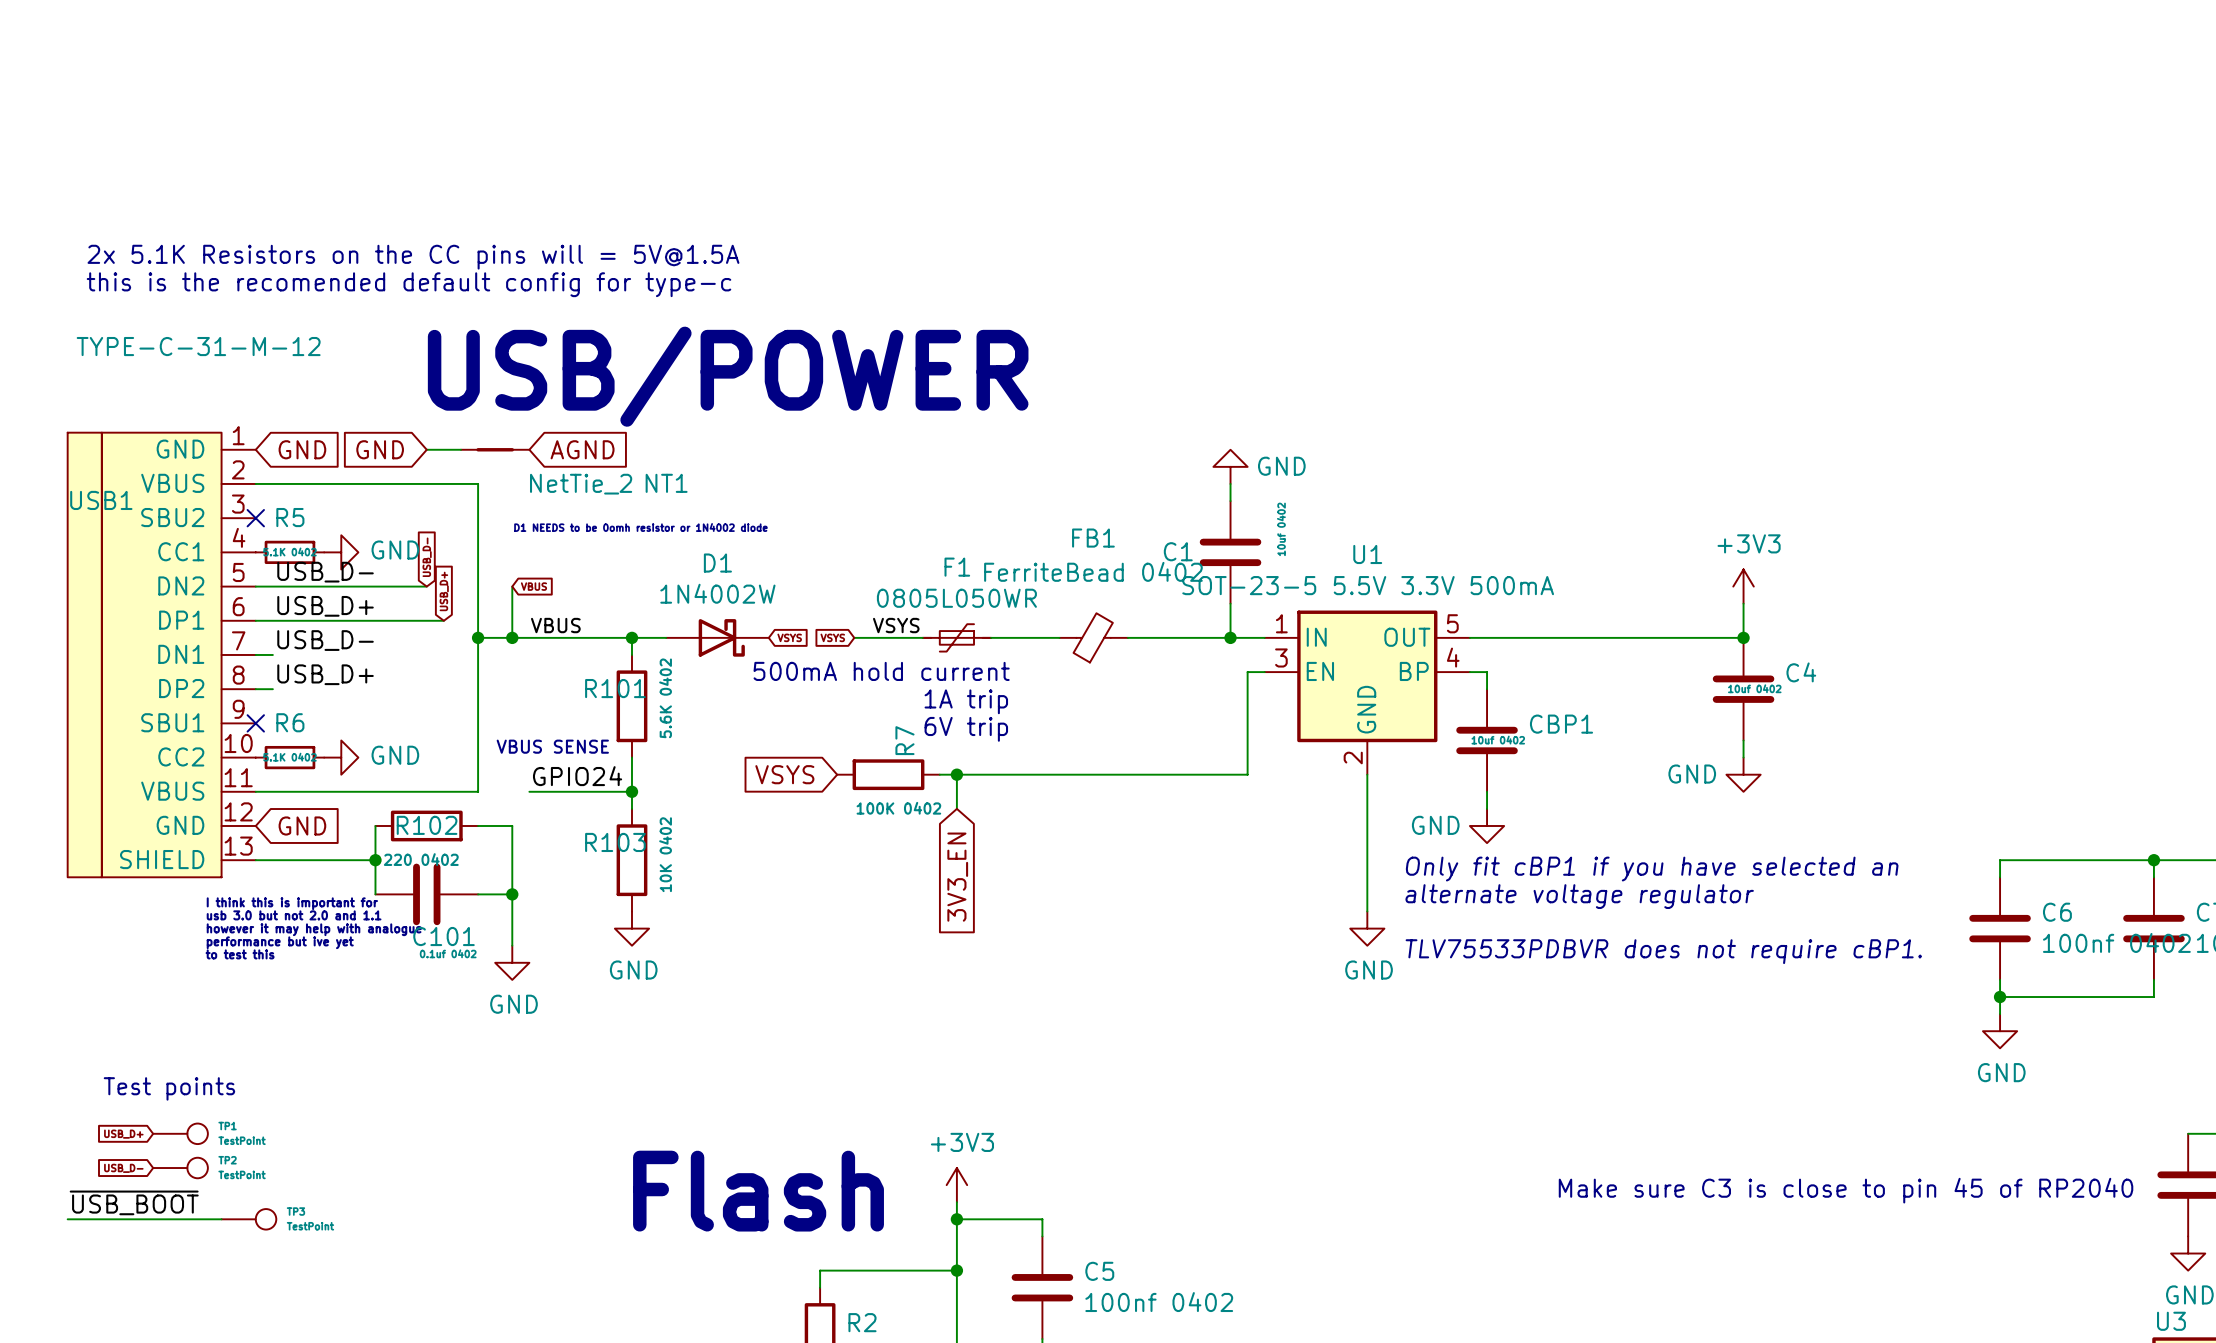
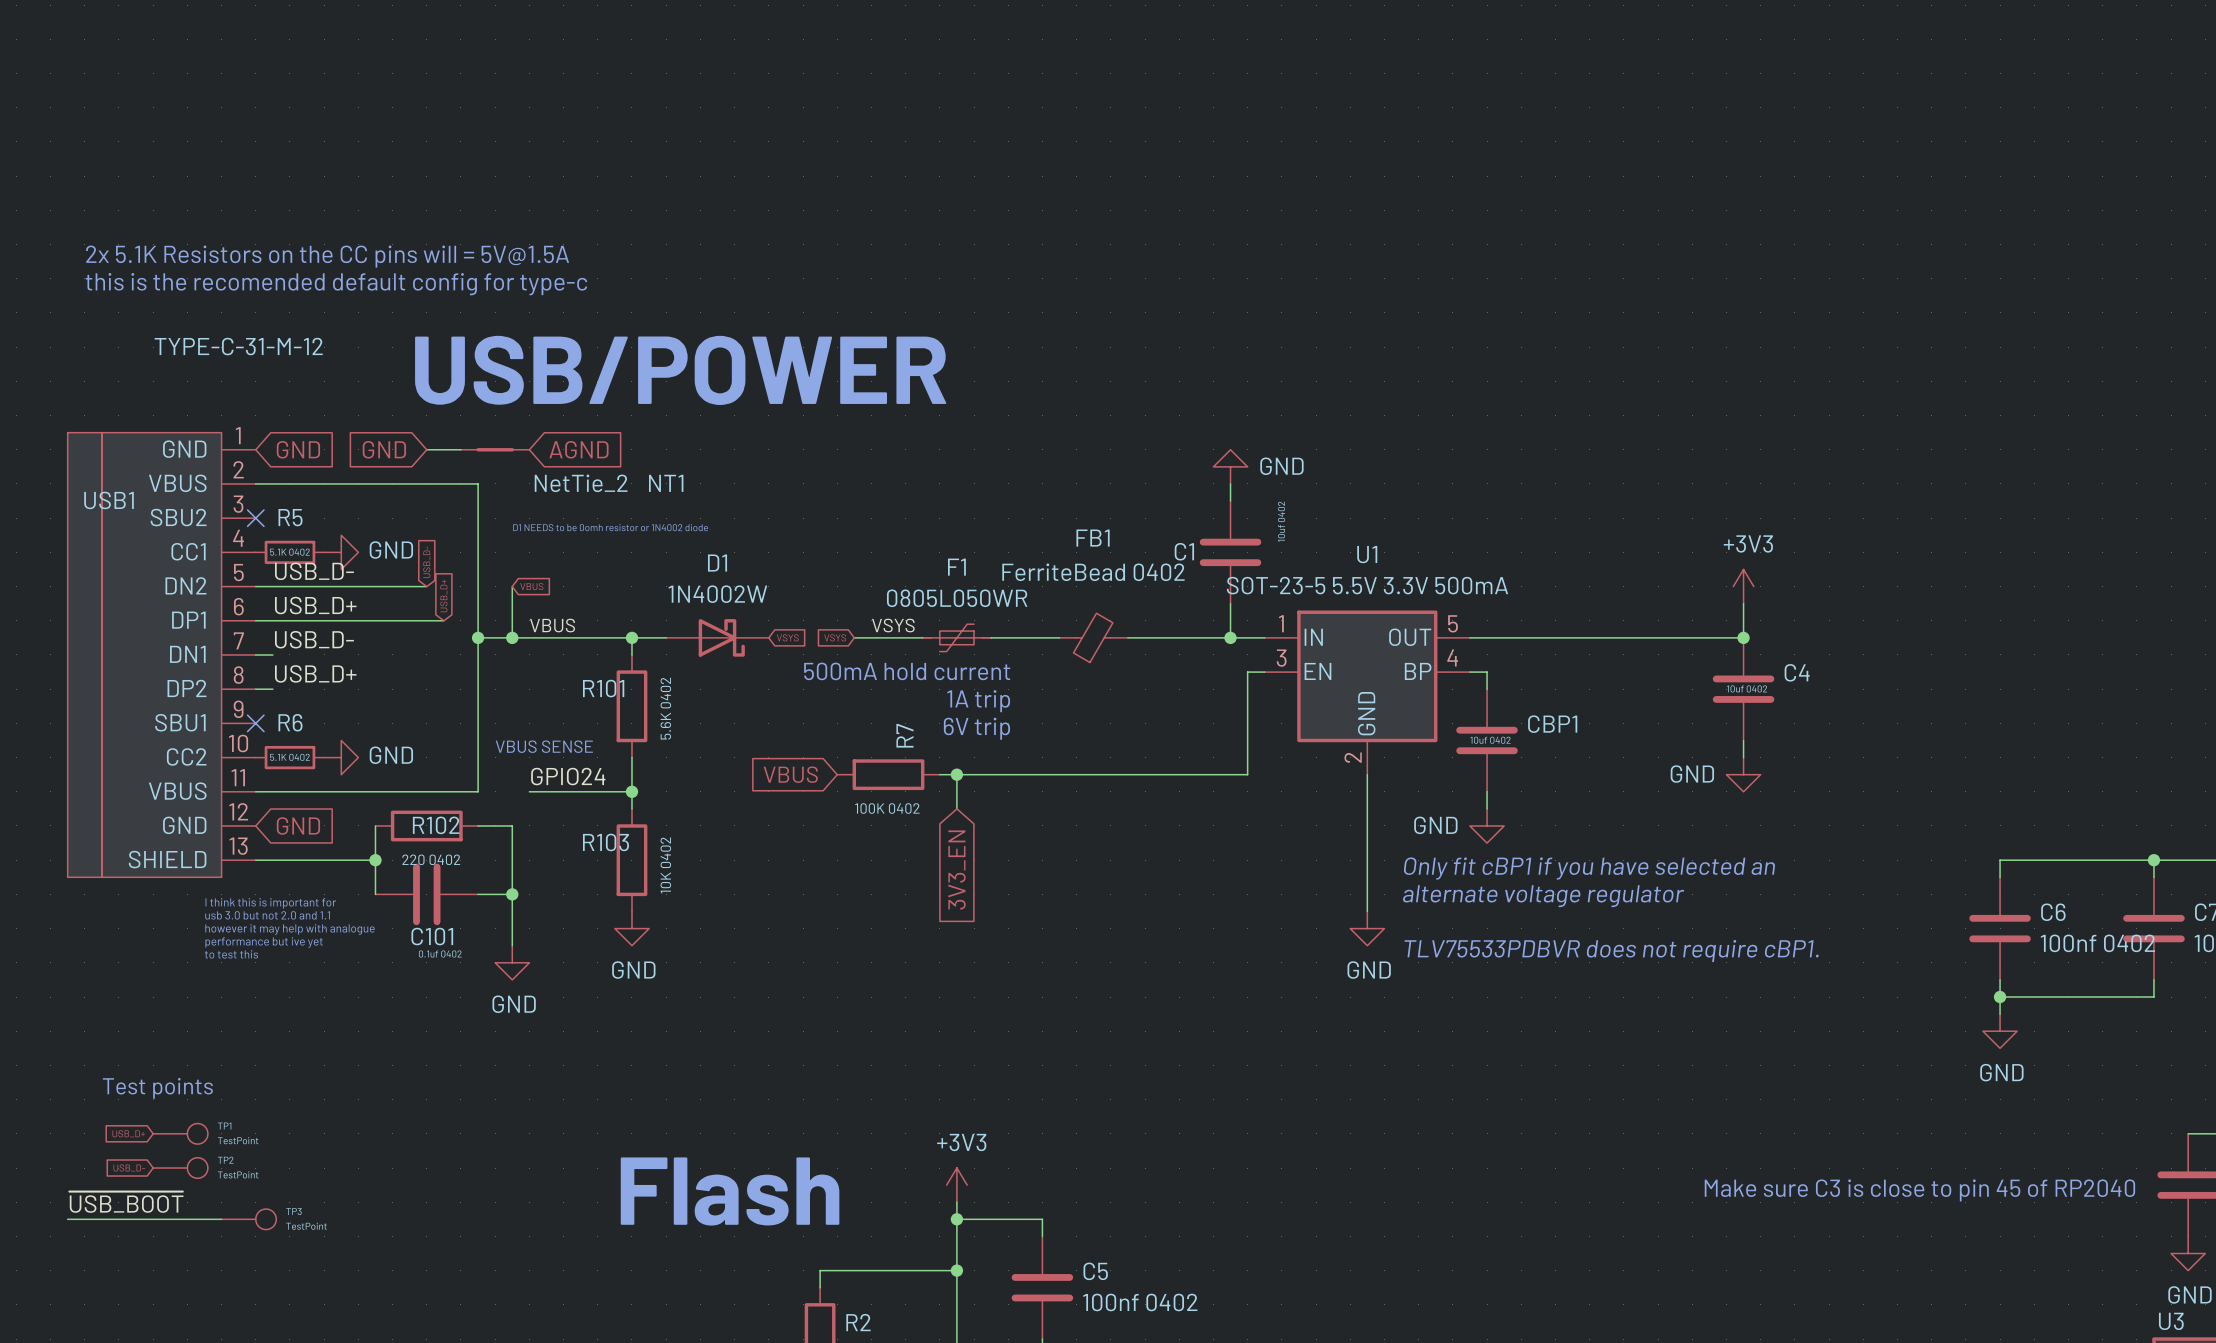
global label: VSYS (784, 774) -> VBUS (790, 774)

